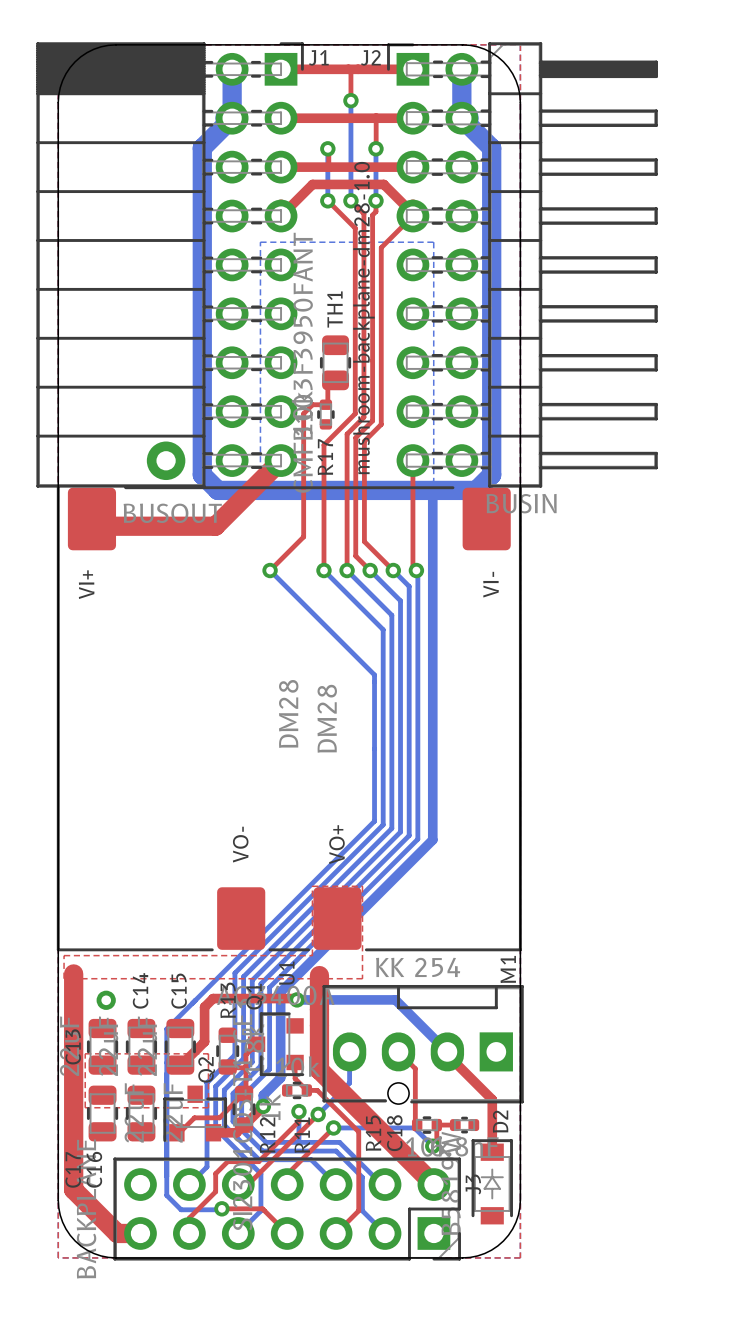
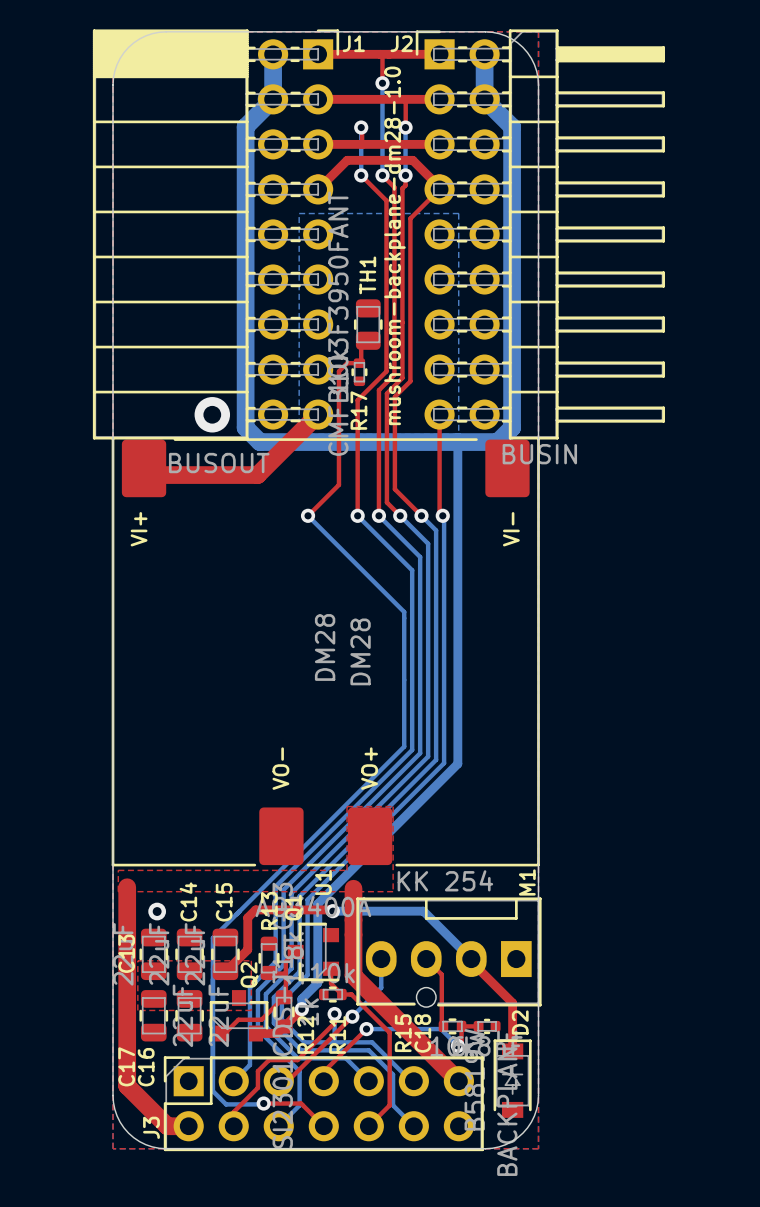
J3 rotation: 0° (287, 1209) -> 180° (323, 1103)

